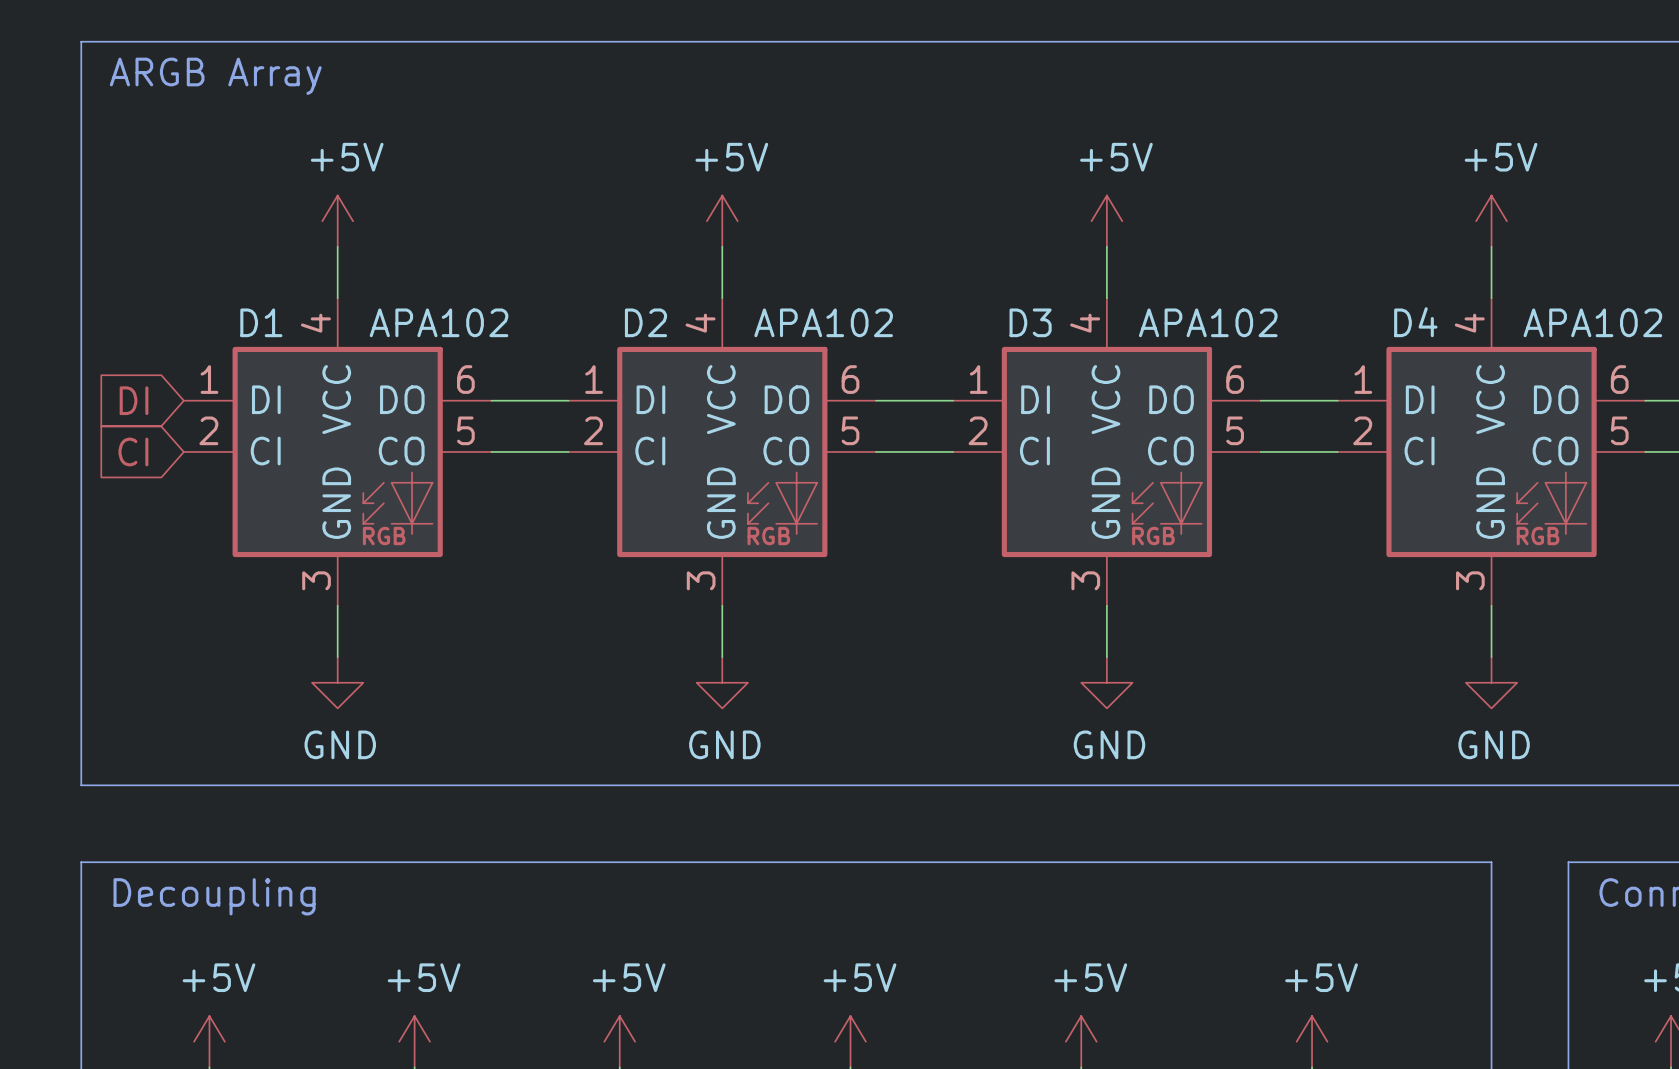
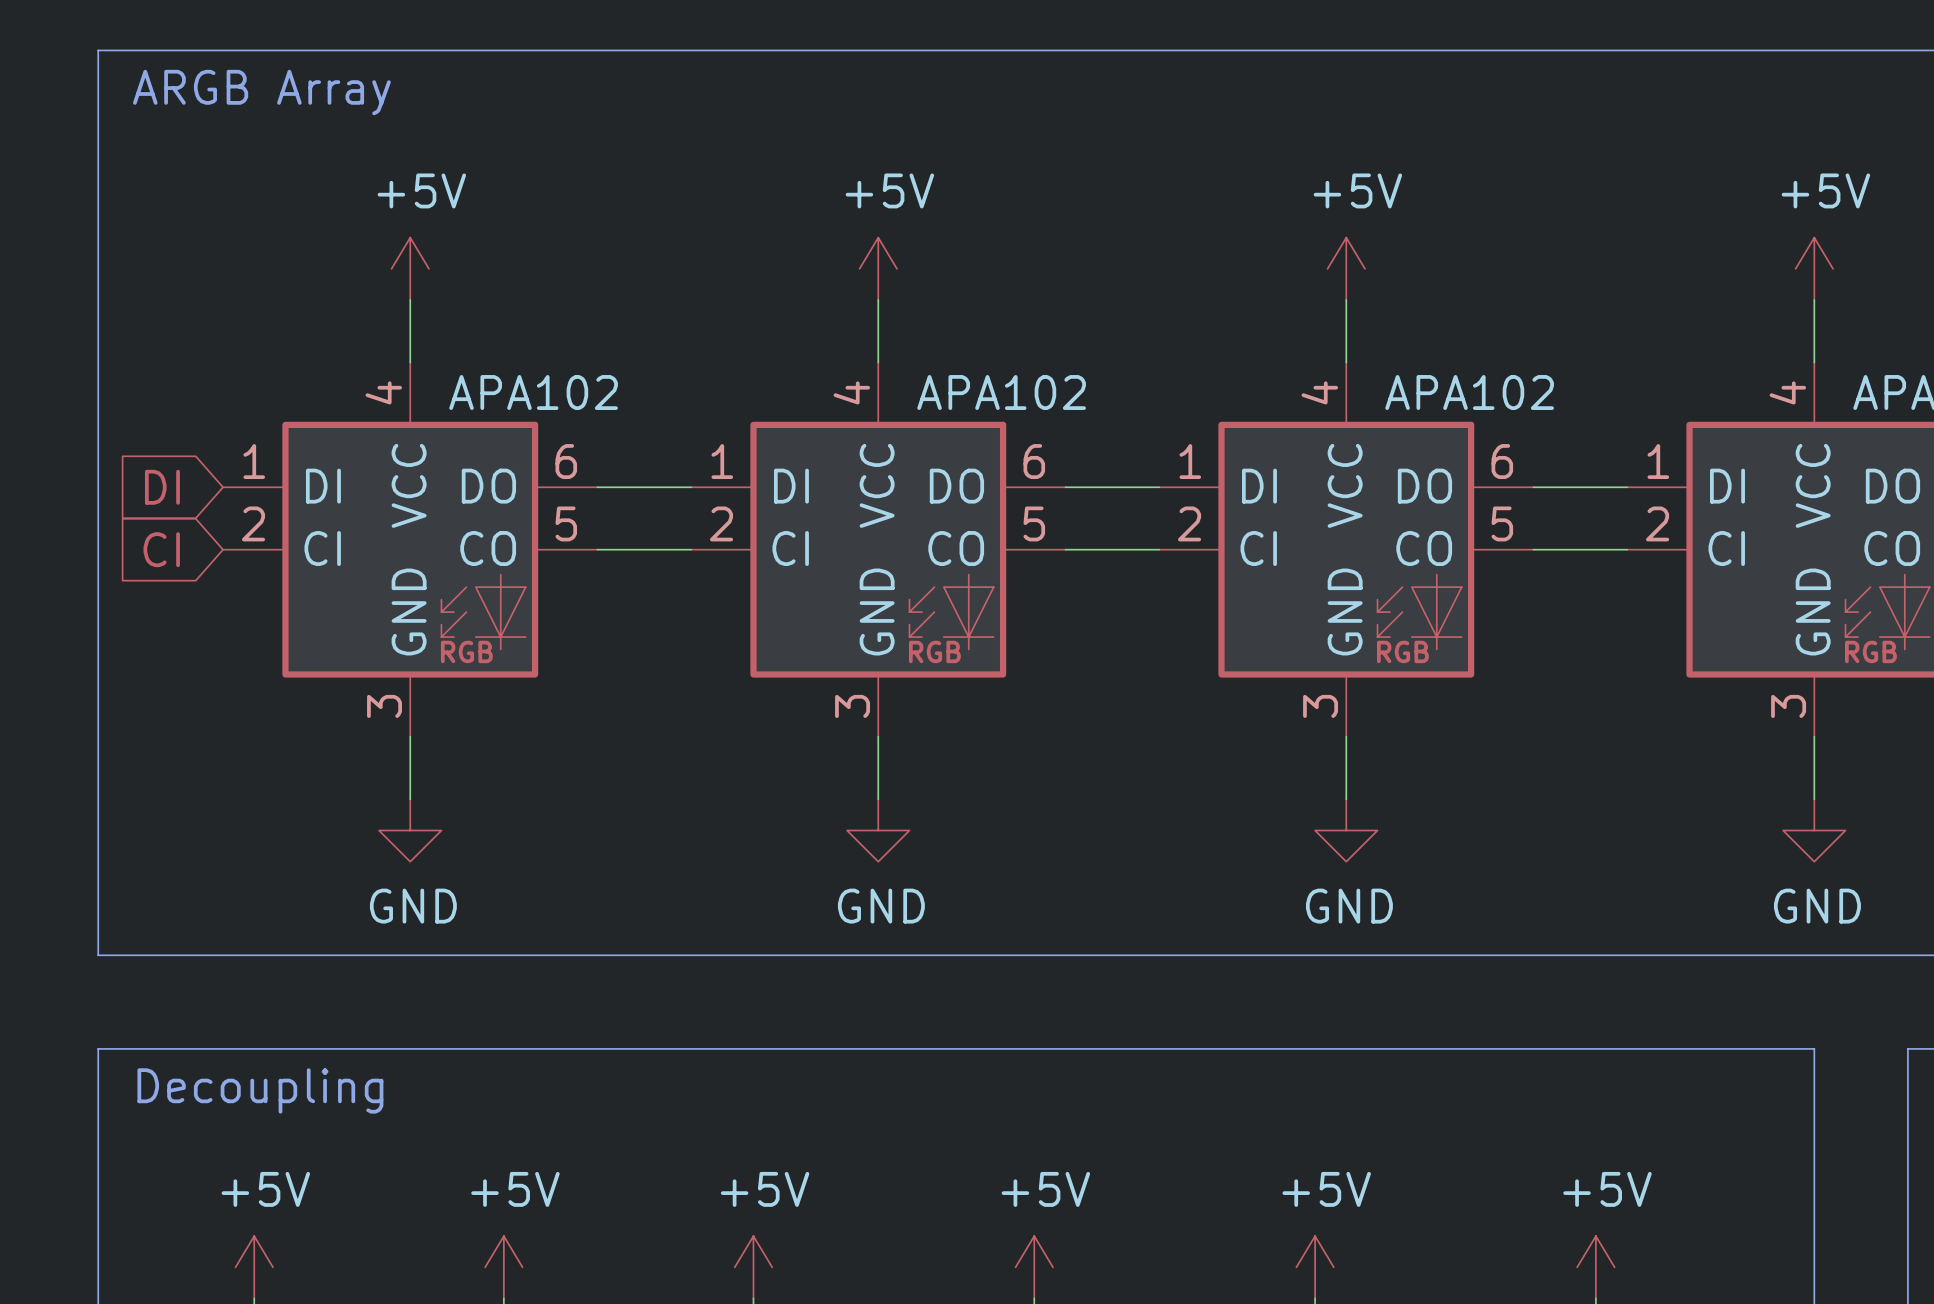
D1 name: D1 (261, 322) -> none
D2 name: D2 (645, 322) -> none
D3 name: D3 (1030, 322) -> none
D4 name: D4 (1415, 322) -> none

